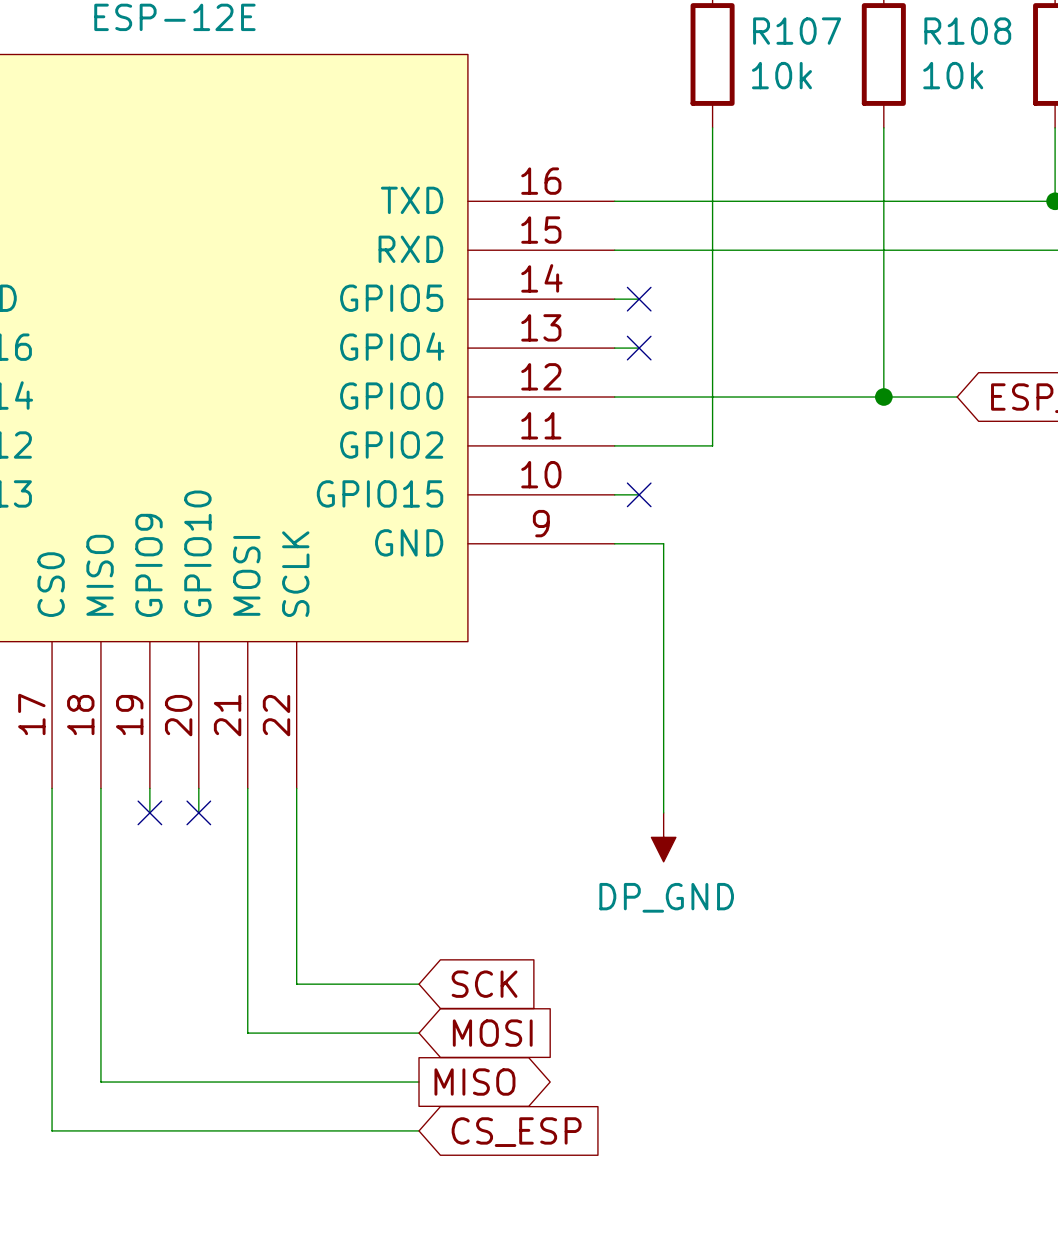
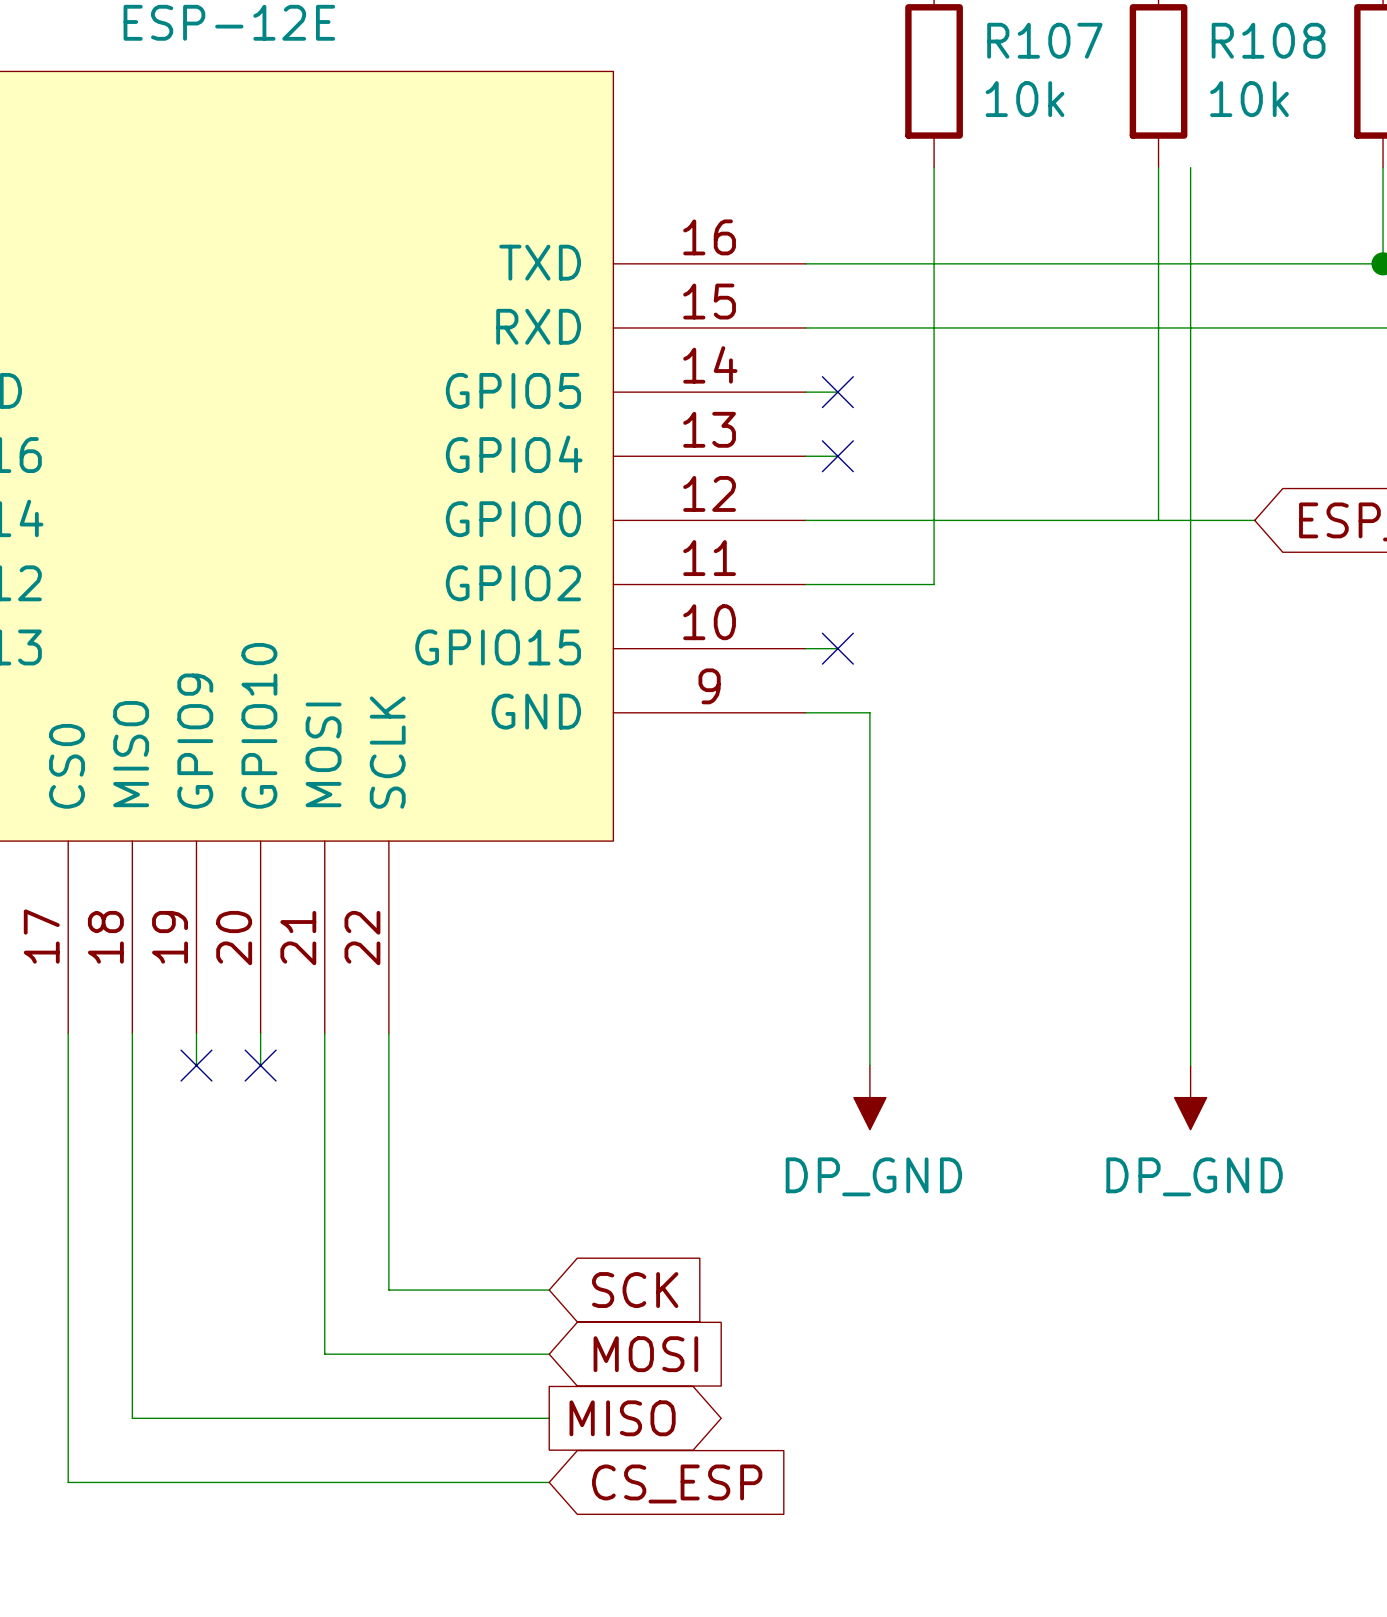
wire: none -> (1190, 167) (1190, 1065)
junction: (883, 397) -> none
power symbol: none -> DP_GND (1190, 1097)

